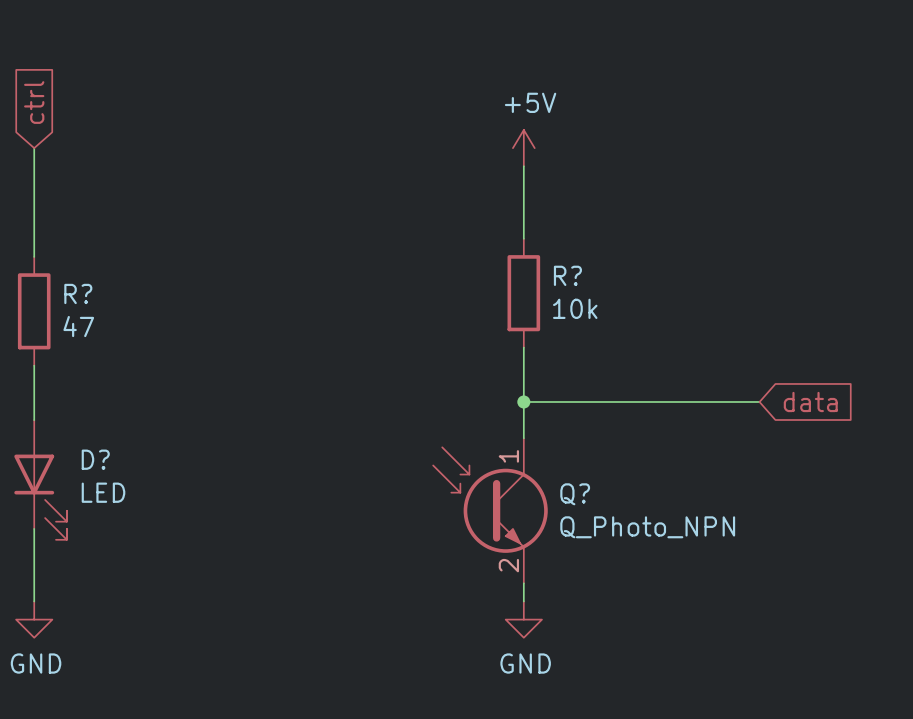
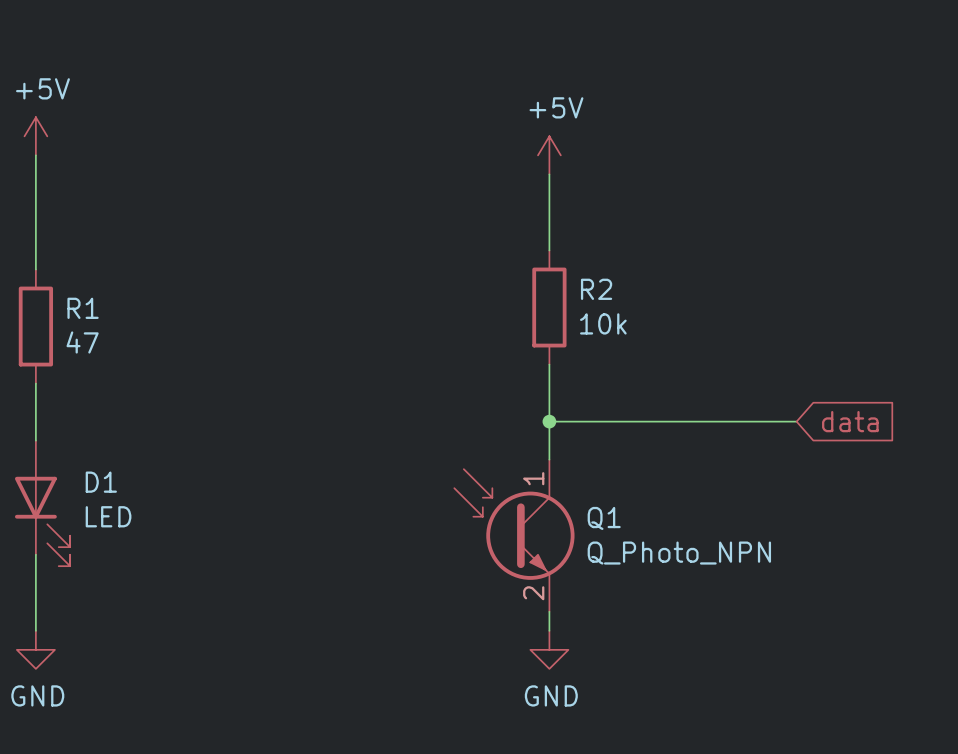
global label: ctrl (34, 102) -> none
power symbol: none -> +5V (35, 136)
R? name: R? (567, 275) -> R2 (596, 289)
R? name: R? (78, 293) -> R1 (83, 308)
D? name: D? (95, 459) -> D1 (101, 482)
Q? name: Q? (575, 494) -> Q1 (604, 518)

